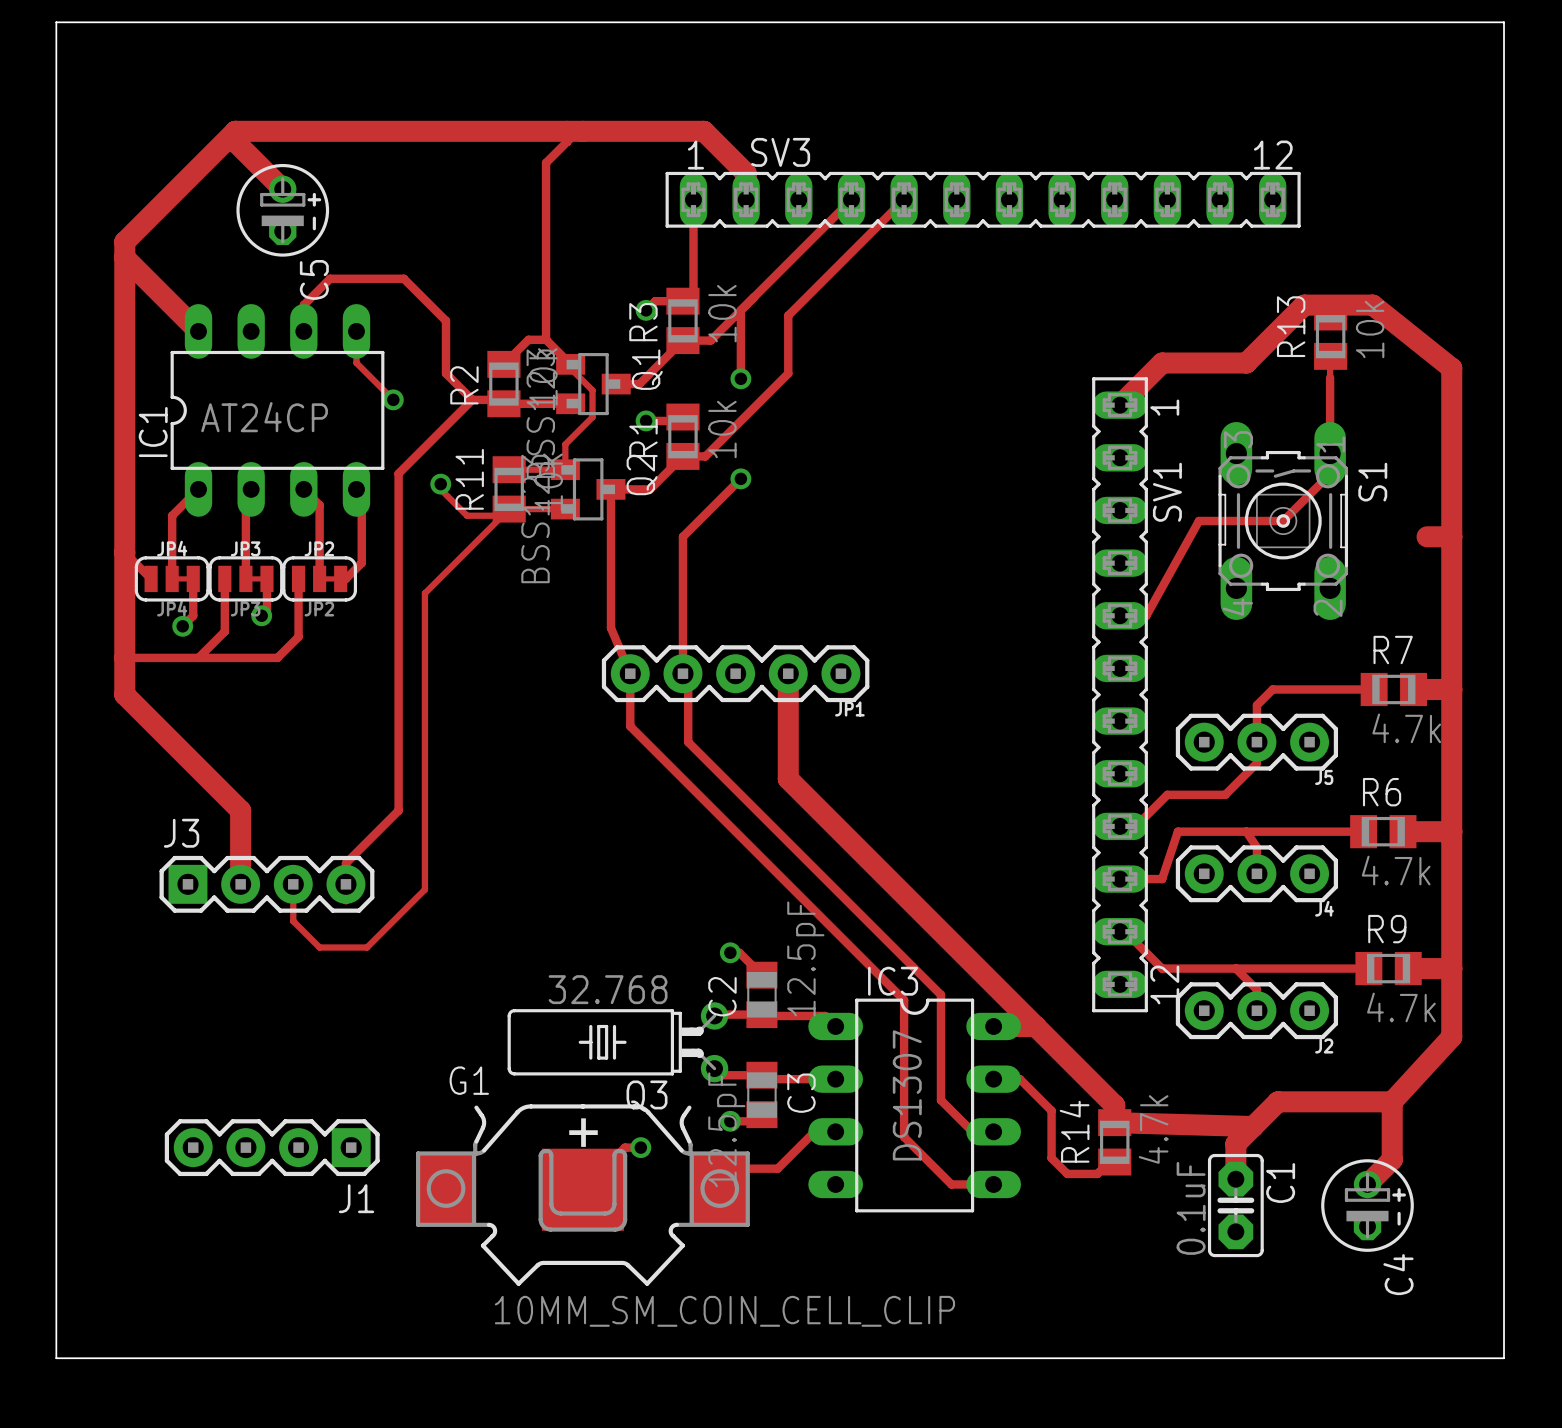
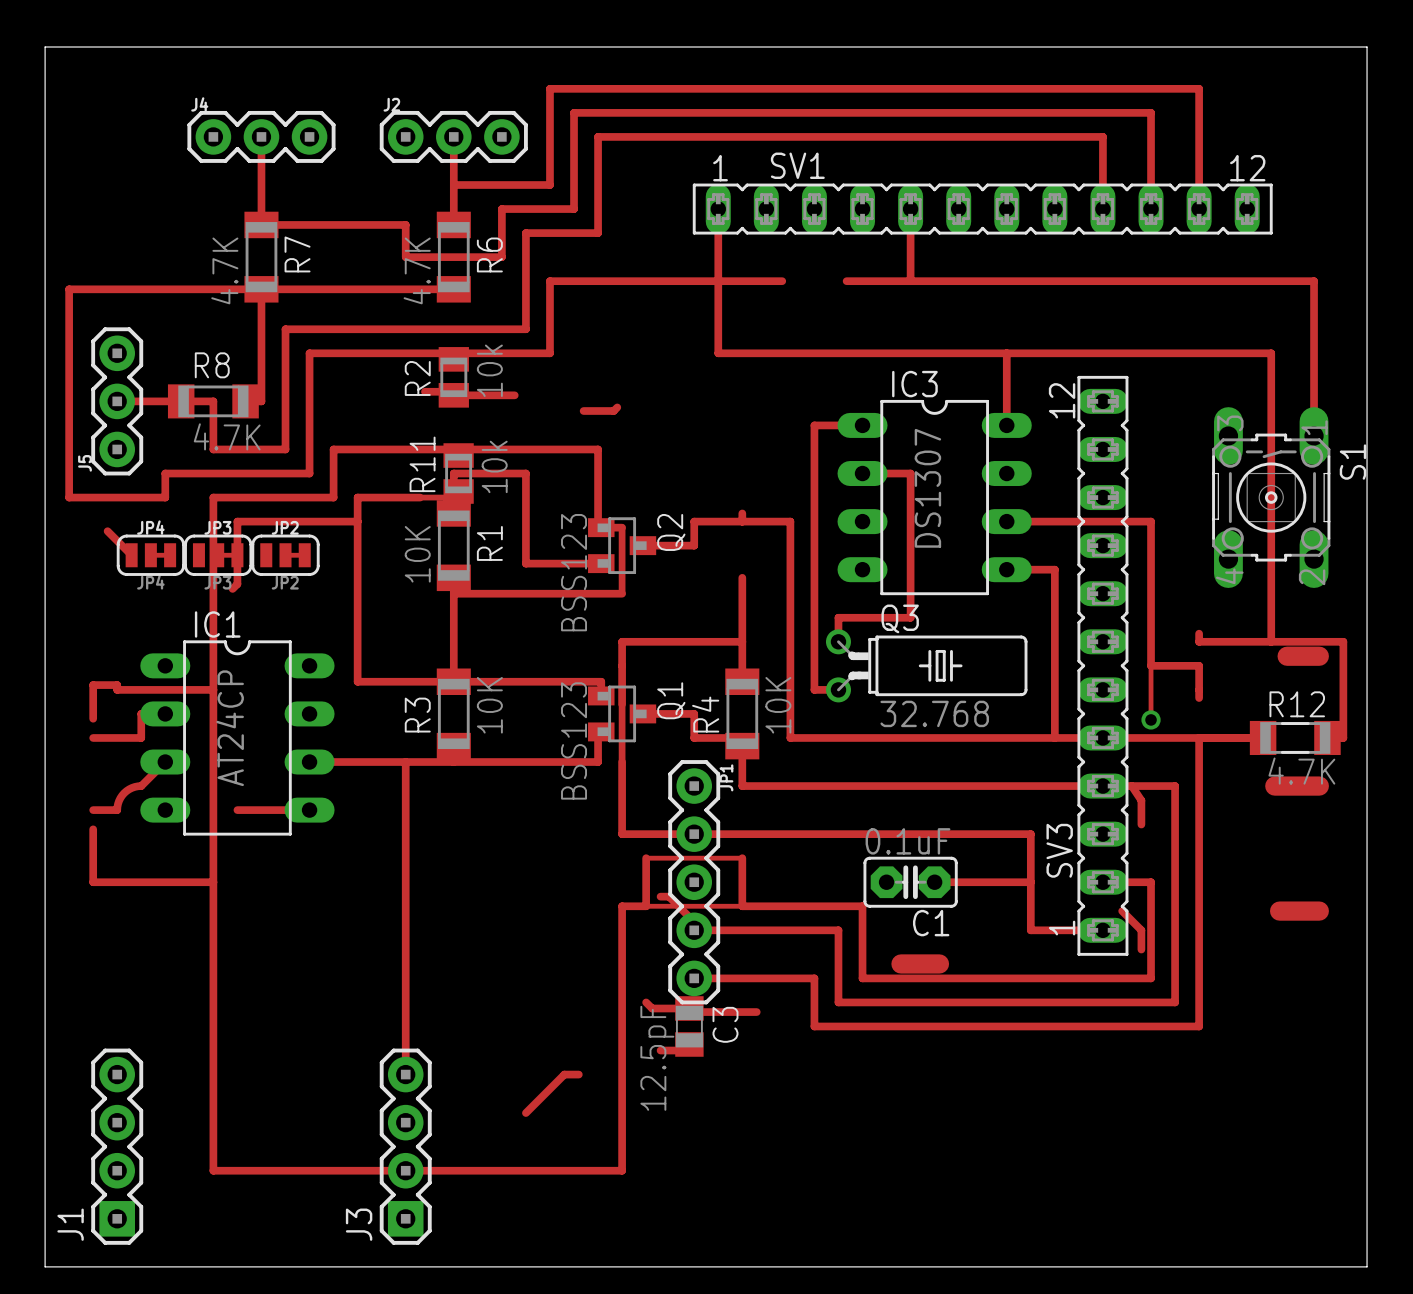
track: none -> (261, 136) (261, 224) (405, 224) (405, 257) (501, 257) (501, 209) (574, 209) (574, 112) (1151, 112) (1151, 209)
track: none -> (453, 136) (453, 224)
track: (235, 131) (124, 241) (124, 694) (240, 810) -> (453, 593) (622, 593) (622, 527) (598, 527) (598, 449) (333, 449) (333, 497) (213, 497) (213, 766)
track: (235, 131) (704, 131) (746, 173) (746, 199) -> none
track: (235, 131) (235, 141) (282, 189) -> none
track: (582, 131) (577, 131) (546, 162) (546, 339) -> none
track: none -> (453, 185) (549, 185) (549, 88) (1199, 88) (1199, 209)
track: (693, 199) (693, 290) (682, 301) (655, 301) (646, 310) -> none
track: none -> (718, 209) (718, 353) (1271, 353) (1271, 641)
track: (851, 199) (710, 340) (682, 340) (639, 384) (616, 384) -> none
track: (904, 199) (788, 315) (788, 373) (705, 456) (682, 456) (649, 489) (610, 489) (610, 628) (630, 673) (630, 726) (904, 1000) (904, 1137) (951, 1184) (993, 1184) -> none
SV3 rotation: 0° (983, 199) -> 90° counterclockwise (1102, 665)
SV3 position: (983, 199) -> (1102, 665)
track: none -> (910, 209) (910, 281)
track: none -> (1102, 209) (1102, 136) (598, 136) (598, 233) (525, 233) (525, 329) (285, 329) (285, 449) (213, 449) (213, 401) (117, 401)
C5: (282, 210) -> none
track: (124, 257) (198, 331) -> none
track: none -> (782, 281) (549, 281) (549, 353) (309, 353) (309, 473) (165, 473) (165, 497) (69, 497) (69, 289) (453, 289)
track: none -> (846, 281) (1314, 281) (1314, 436)
track: none -> (261, 289) (261, 401) (245, 401)
R3 footprint: [666, 287, 700, 355] -> [436, 668, 471, 760]
via: (646, 310) -> none
track: (740, 310) (740, 378) -> none
R3 value: 10k (722, 313) -> 10K (489, 705)
track: (303, 331) (303, 305) (330, 278) (403, 278) (446, 320) (446, 373) (472, 399) (398, 473) (398, 515) -> none
track: (356, 331) (356, 363) (393, 399) -> none
R13: 10k (1330, 336) -> none
track: (546, 339) (592, 390) (592, 417) (565, 444) (565, 469) (509, 469) -> none
track: (546, 339) (528, 339) (503, 364) -> none
track: (1330, 356) (1330, 473) (1283, 520) (1199, 520) (1146, 615) (1120, 615) -> none
track: none -> (1006, 353) (1006, 425)
SV1 footprint: [1092, 377, 1148, 1013] -> [692, 183, 1273, 235]
via: (740, 378) -> none
Q1 position: (593, 384) -> (622, 713)
via: (393, 399) -> none
R1 footprint: [666, 403, 700, 470] -> [436, 500, 471, 592]
track: (1120, 405) (1162, 363) (1246, 363) (1304, 305) (1372, 305) (1451, 368) (1451, 1037) (1392, 1101) -> none
R8: none -> 4.7K (213, 401)
IC1 rotation: 0° (277, 410) -> 90° clockwise (237, 737)
IC1 position: (277, 410) -> (237, 737)
via: (646, 420) -> none
R1 value: 10k (722, 429) -> 10K (417, 554)
track: none -> (862, 425) (814, 425) (814, 689) (838, 689)
R1 name position: R1 (643, 437) -> R1 (489, 543)
track: (740, 478) (682, 536) (682, 673) (688, 678) -> (742, 641) (622, 641) (622, 646)
via: (740, 478) -> none
track: (440, 484) (440, 489) (467, 515) -> (357, 497) (420, 497)
via: (440, 484) -> none
track: (198, 489) (172, 515) (172, 578) -> none
track: (251, 489) (245, 494) (245, 578) -> none
track: (303, 489) (319, 505) (319, 578) -> none
track: (356, 489) (361, 494) (361, 563) (345, 578) (340, 578) -> none
Q2 position: (588, 489) -> (622, 545)
track: none -> (862, 473) (910, 473) (910, 617) (838, 617) (838, 641)
SV1 name position: SV1 (1167, 492) -> SV1 (797, 165)
track: (565, 509) (509, 509) (424, 593) (424, 889) (367, 947) (319, 947) (293, 921) (293, 884) -> none
S1 position: (1283, 520) -> (1271, 497)
track: none -> (453, 513) (453, 473) (525, 473) (525, 563) (601, 563)
track: none -> (742, 513) (742, 521)
track: (1427, 536) (1451, 536) -> none
track: none -> (357, 521) (237, 521) (237, 555)
track: none -> (1006, 521) (1151, 521) (1151, 665)
track: none -> (642, 545) (694, 545) (694, 521) (790, 521) (790, 737) (1263, 737)
track: (193, 578) (193, 615) (182, 626) -> none
track: (224, 578) (224, 631) (198, 657) -> none
track: (298, 578) (298, 636) (277, 657) (124, 657) -> none
track: none -> (1006, 569) (1054, 569) (1054, 737)
track: none -> (453, 577) (453, 681)
track: none -> (742, 577) (742, 681)
via: (261, 615) -> none
via: (182, 626) -> none
R7 name position: R7 (1393, 650) -> R7 (297, 254)
track: none -> (1199, 633) (1199, 641) (1343, 641) (1343, 737) (1327, 737)
R7 footprint: [1360, 672, 1428, 707] -> [244, 211, 279, 303]
JP1 rotation: 0° (735, 673) -> 90° clockwise (694, 882)
JP1 position: (735, 673) -> (694, 882)
track: (788, 673) (788, 779) (1114, 1105) (1114, 1122) (1253, 1126) -> none
track: (1374, 689) (1272, 689) (1256, 705) (1256, 763) (1225, 794) (1167, 794) (1130, 831) (1120, 826) -> none
track: none -> (1151, 665) (1199, 665) (1199, 698)
track: none -> (1151, 665) (1151, 719)
JP1 name position: JP1 (849, 708) -> JP1 (726, 777)
track: (398, 717) (398, 810) (345, 863) (345, 900) -> (357, 681) (601, 681) (601, 695)
track: none -> (213, 689) (117, 689) (117, 685) (93, 685) (93, 718)
R7 value: 4.7k (1406, 728) -> 4.7K (224, 270)
track: (688, 742) (940, 994) (940, 1100) (972, 1131) (993, 1131) -> (622, 704) (622, 834) (1030, 834) (1030, 930) (1102, 930)
J5 rotation: 0° (1256, 742) -> 90° clockwise (117, 401)
J5 position: (1256, 742) -> (117, 401)
track: none -> (165, 713) (141, 713) (141, 737) (93, 737)
R4: none -> 10K (742, 713)
via: none -> (1151, 719)
track: none -> (601, 731) (598, 731) (598, 762) (309, 762)
track: none -> (1199, 737) (1199, 1026) (814, 1026) (814, 978) (694, 978)
R12: none -> 4.7K (1295, 737)
R6 name position: R6 (1382, 792) -> R6 (489, 254)
track: none -> (165, 762) (141, 786) (132, 787) (124, 793) (119, 800) (117, 810) (93, 810)
track: none -> (405, 762) (405, 1074)
track width: thick (240, 810) (240, 884) -> thin (213, 766) (213, 834)
R6 footprint: [1350, 815, 1417, 849] -> [436, 211, 471, 303]
track: (1177, 831) (1162, 879) (1120, 879) -> (1069, 786) (742, 786) (742, 737) (694, 737) (694, 713) (642, 713)
track: (1293, 831) (1363, 831) -> (1175, 786) (1175, 1002) (838, 1002) (838, 930) (694, 930)
track: none -> (237, 810) (309, 810)
R6 value: 4.7k (1396, 870) -> 4.7K (417, 270)
J4 position: (1256, 873) -> (261, 136)
track: none -> (93, 829) (93, 882) (213, 882)
track: none -> (213, 834) (213, 1170) (622, 1170) (622, 906) (646, 906)
J3 rotation: 0° (266, 884) -> 90° counterclockwise (405, 1146)
J3 position: (266, 884) -> (405, 1146)
J4 name position: J4 (1324, 908) -> J4 (199, 104)
track: (1120, 931) (1130, 936) (1162, 968) (1365, 968) -> none
track: none -> (934, 882) (1030, 882)
track: none -> (1102, 882) (1151, 882) (1151, 978) (862, 978) (862, 906) (742, 906)
via: (730, 952) -> none
track: none -> (646, 906) (646, 858) (742, 858) (742, 906)
track: none -> (646, 906) (742, 906)
R9: 4.7k (1388, 968) -> none
C2: 12.5pF (761, 994) -> none
J2 position: (1256, 1010) -> (453, 136)
track: (714, 1015) (825, 1015) (835, 1026) -> none
Q3 rotation: 0° (617, 1042) -> 180° (926, 665)
Q3 position: (617, 1042) -> (926, 665)
J2 name position: J2 (1324, 1045) -> J2 (391, 104)
track: (993, 1079) (1019, 1079) (1051, 1110) (1051, 1158) (1067, 1173) (1097, 1173) (1109, 1162) (1114, 1162) -> none
track: (1392, 1101) (1277, 1101) (1235, 1143) (1235, 1179) -> none
track: (1392, 1101) (1392, 1159) (1367, 1184) -> none
IC3 position: (914, 1105) -> (934, 497)
via: (730, 1121) -> none
track: (835, 1131) (814, 1131) (777, 1168) (740, 1168) (719, 1189) -> none
R14: 4.7k (1114, 1142) -> none
J1 rotation: 0° (272, 1147) -> 90° clockwise (117, 1146)
J1 position: (272, 1147) -> (117, 1146)
via: (640, 1147) -> none
G1: 10MM_SM_COIN_CELL_CLIP (582, 1195) -> none
C1 rotation: 0° (1235, 1205) -> 90° clockwise (910, 882)
C1 position: (1235, 1205) -> (910, 882)
C4: (1367, 1205) -> none

